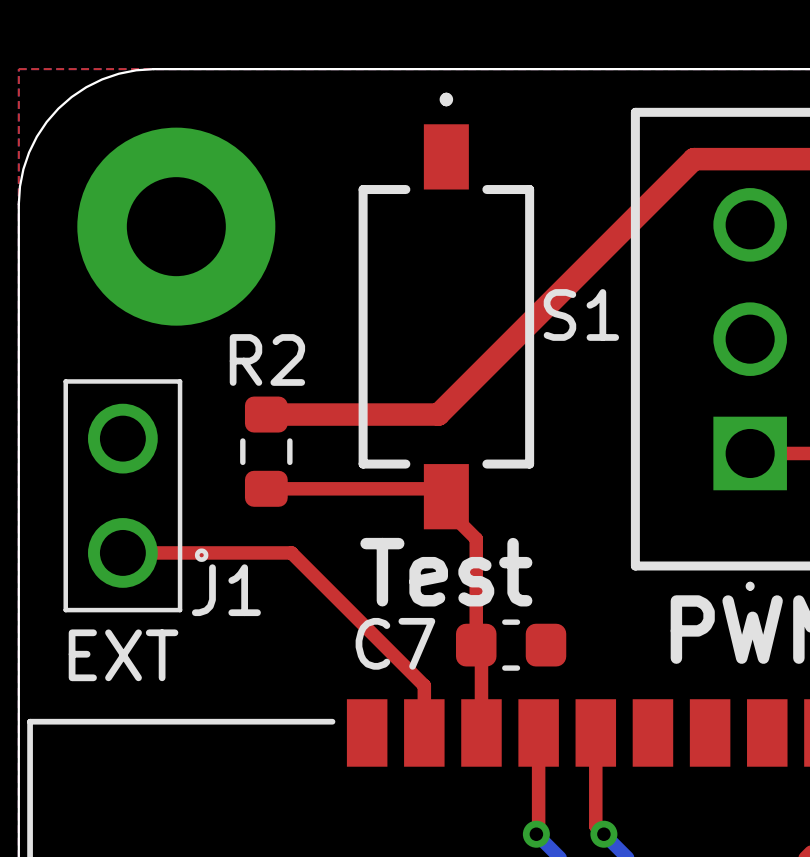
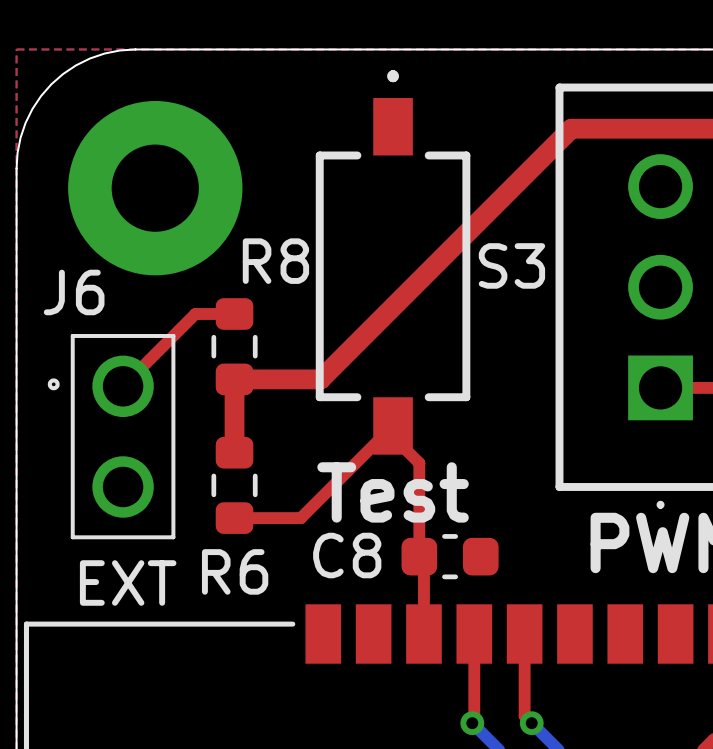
top track: (693, 159) (438, 414) (266, 414) -> (611, 128) (571, 128) (320, 379) (234, 379) (234, 452)
S1 name: S1 (581, 314) -> S3 (511, 265)
R2 name: R2 (267, 359) -> R8 (275, 261)
top track: none -> (234, 314) (195, 314) (123, 386)
R2 position: (266, 451) -> (234, 346)
top track: (266, 488) (438, 488) -> none
J1: EXT (135, 495) -> none
top track: none -> (393, 425) (300, 518) (234, 518)
J6: none -> EXT (111, 436)
top track: (122, 552) (291, 552) (424, 685) (424, 732) -> none
R6: none -> (234, 485)
C7 name: C7 (395, 643) -> C8 (347, 555)

